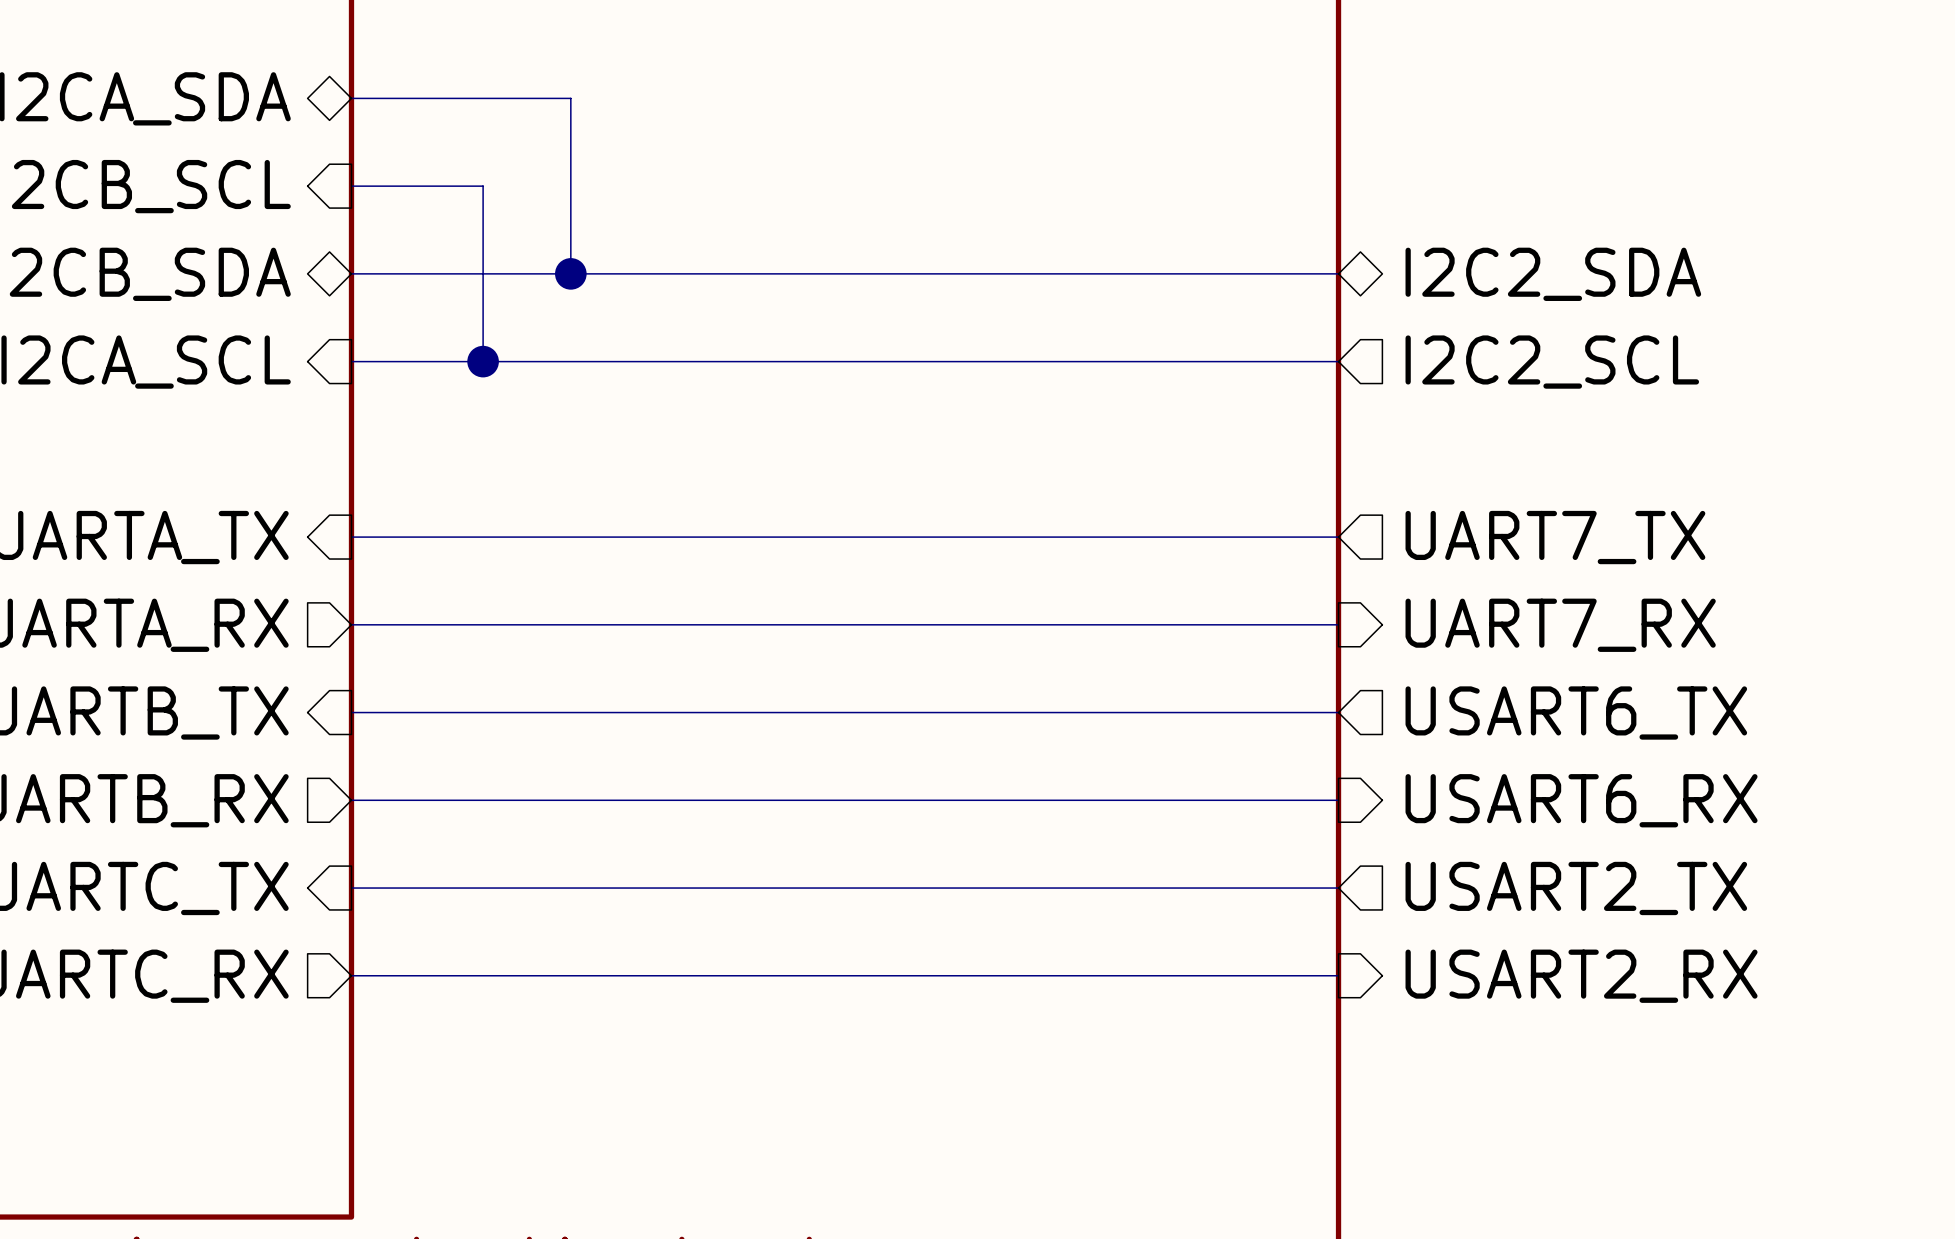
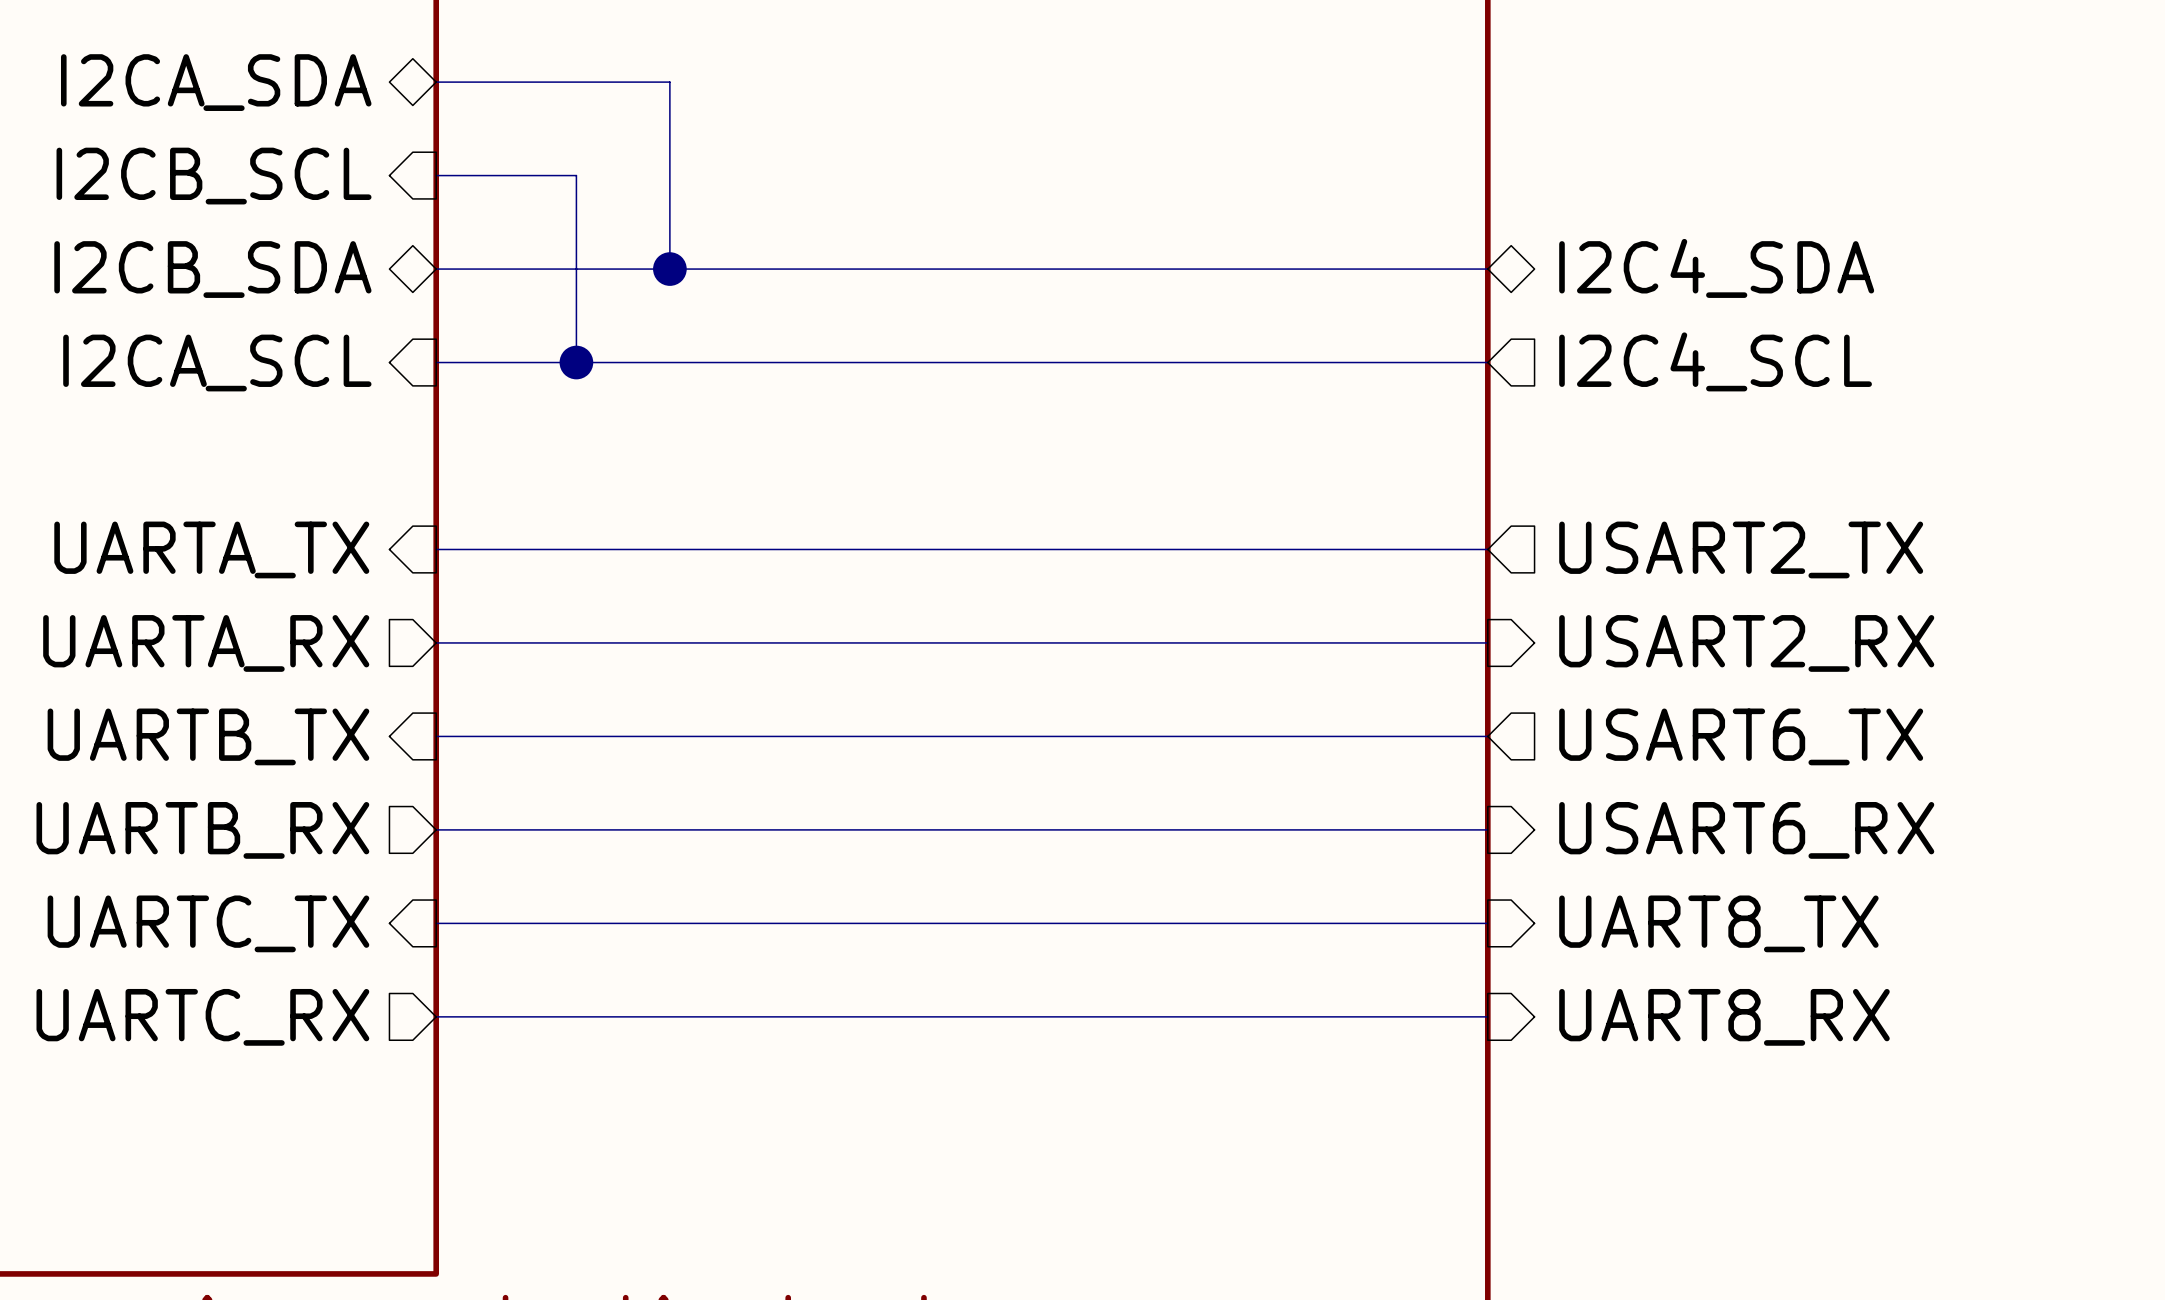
sheet pin: I2C2_SDA (1553, 274) -> I2C4_SDA (1716, 268)
sheet pin: I2C2_SCL (1552, 362) -> I2C4_SCL (1715, 361)
sheet pin: UART7_TX (1555, 537) -> USART2_TX (1741, 549)
sheet pin: UART7_RX (1560, 625) -> USART2_RX (1746, 643)
sheet pin shape: output (1576, 888) -> input (1718, 923)
sheet pin: USART2_TX (1576, 888) -> UART8_TX (1718, 923)
sheet pin: USART2_RX (1581, 976) -> UART8_RX (1724, 1017)

